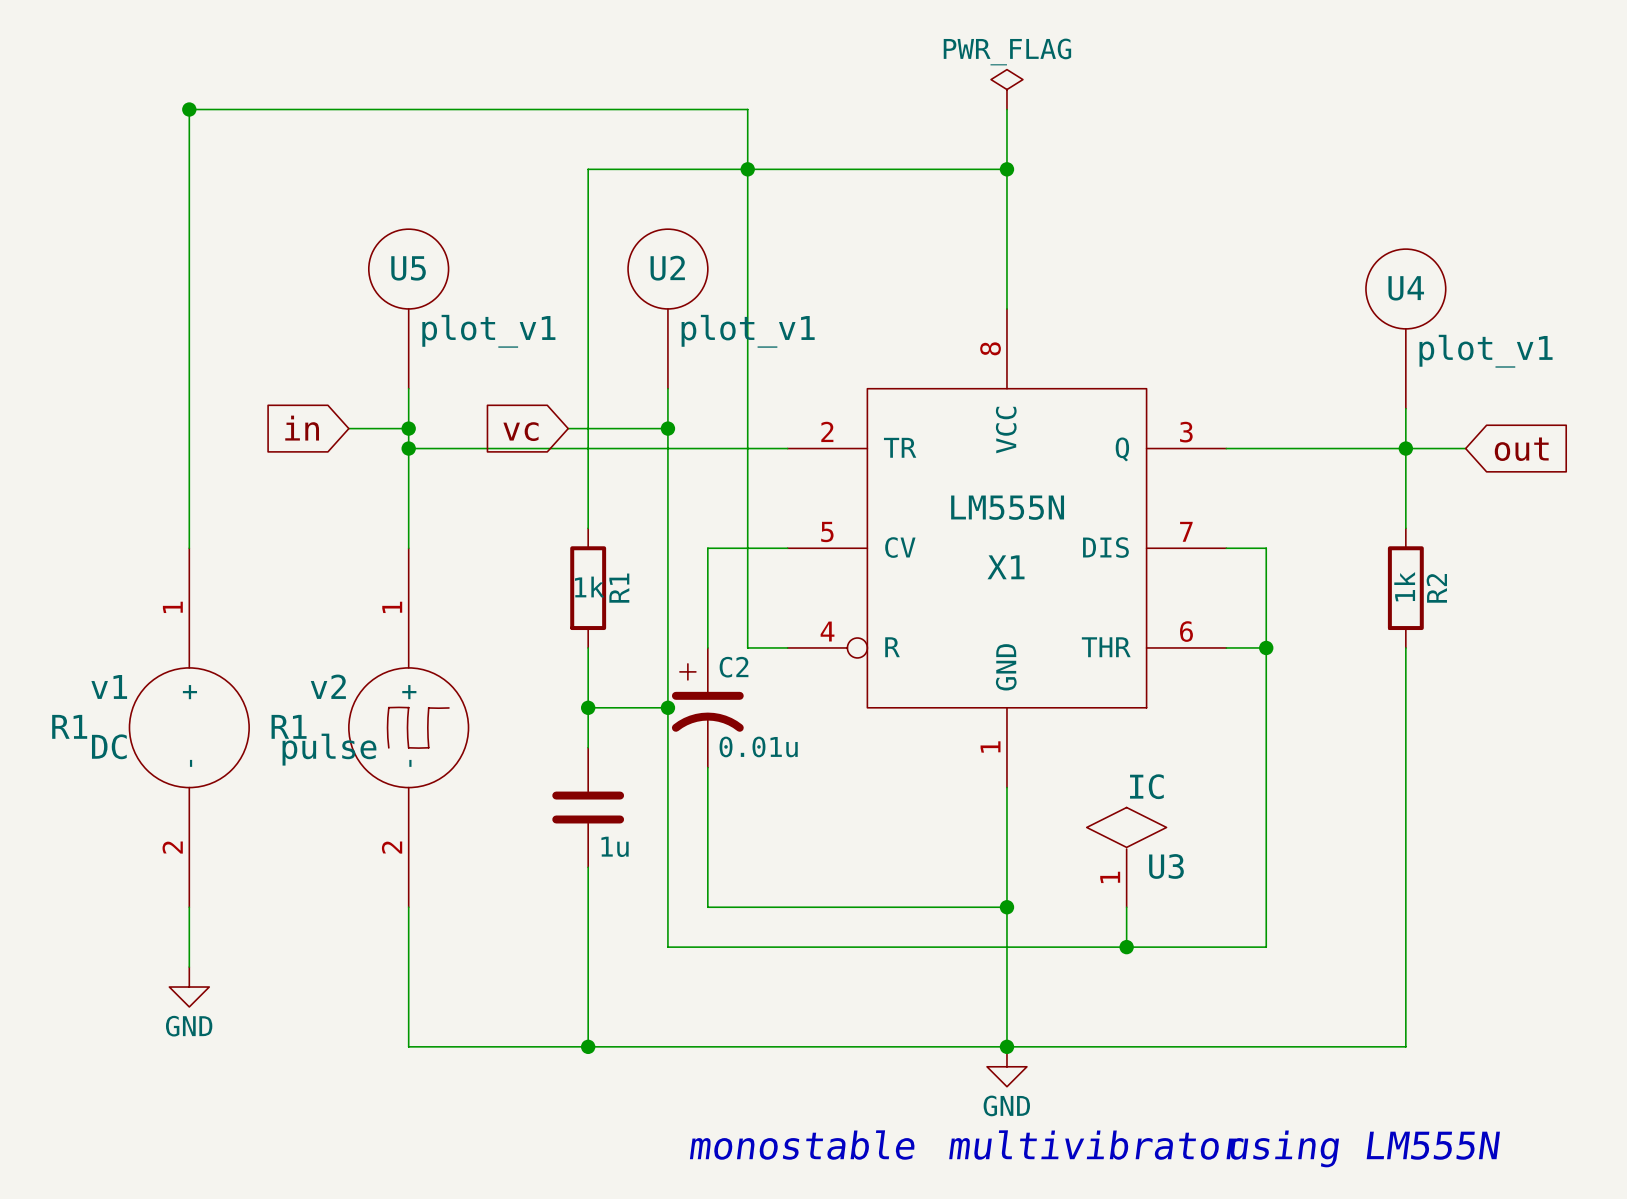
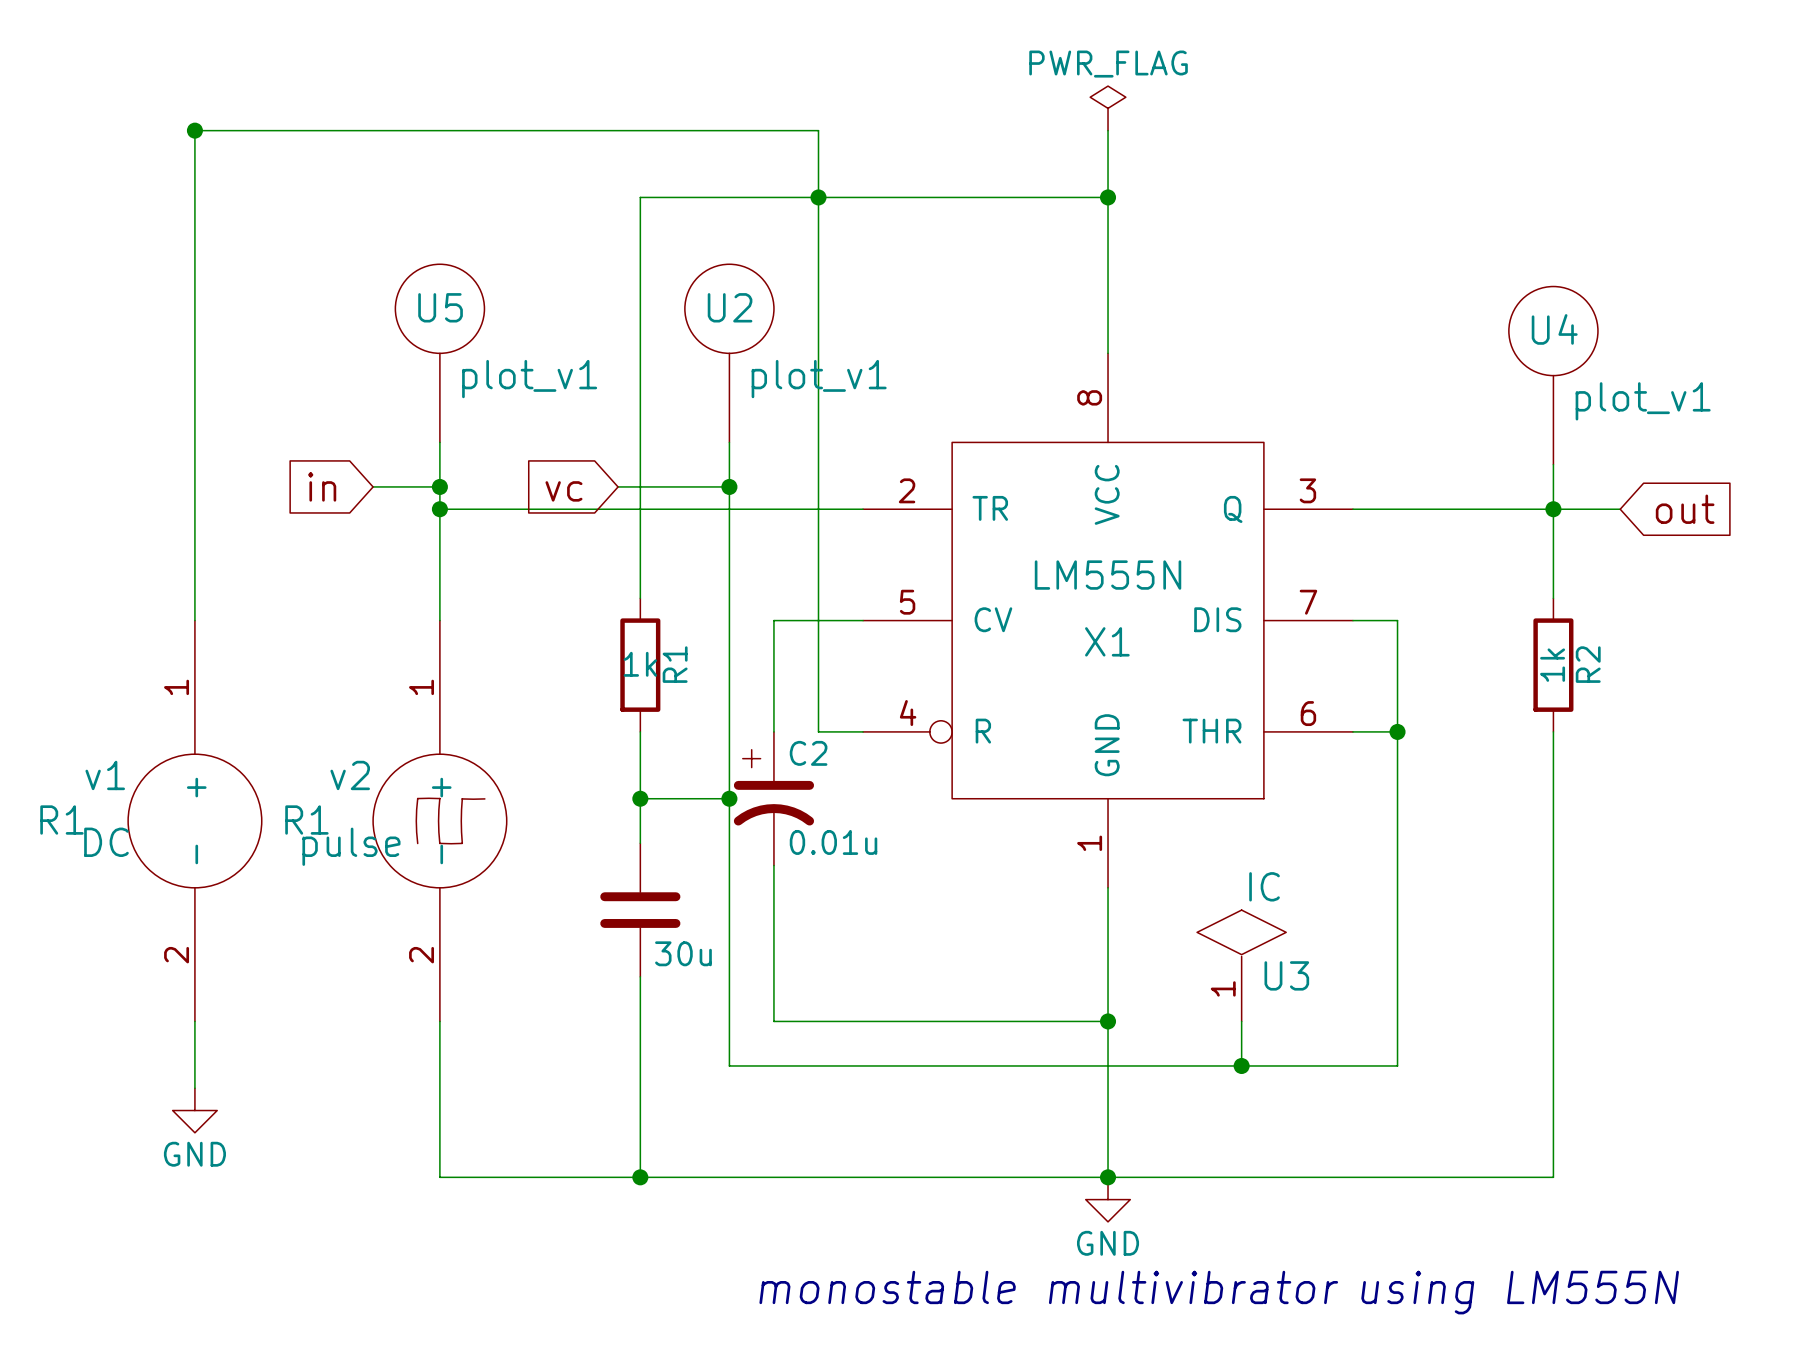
part value: 1u (615, 846) -> 30u (683, 953)

